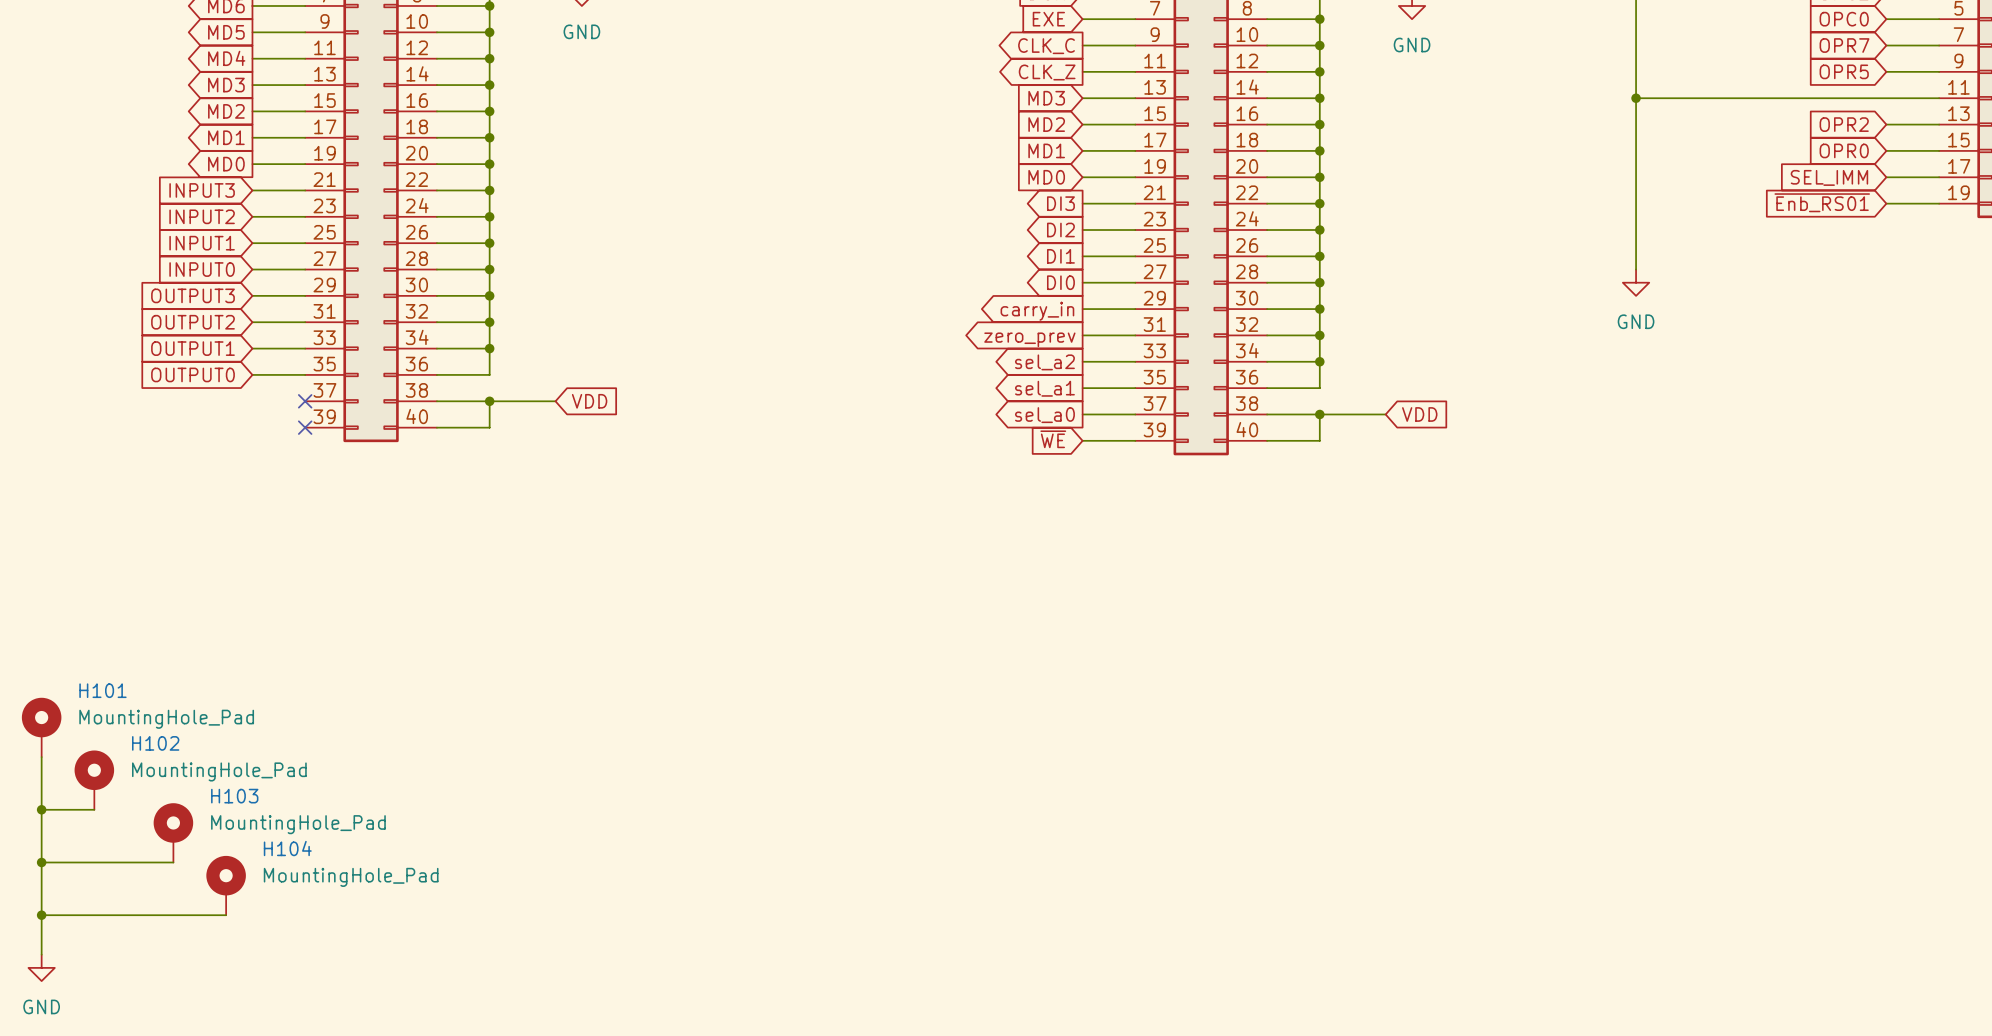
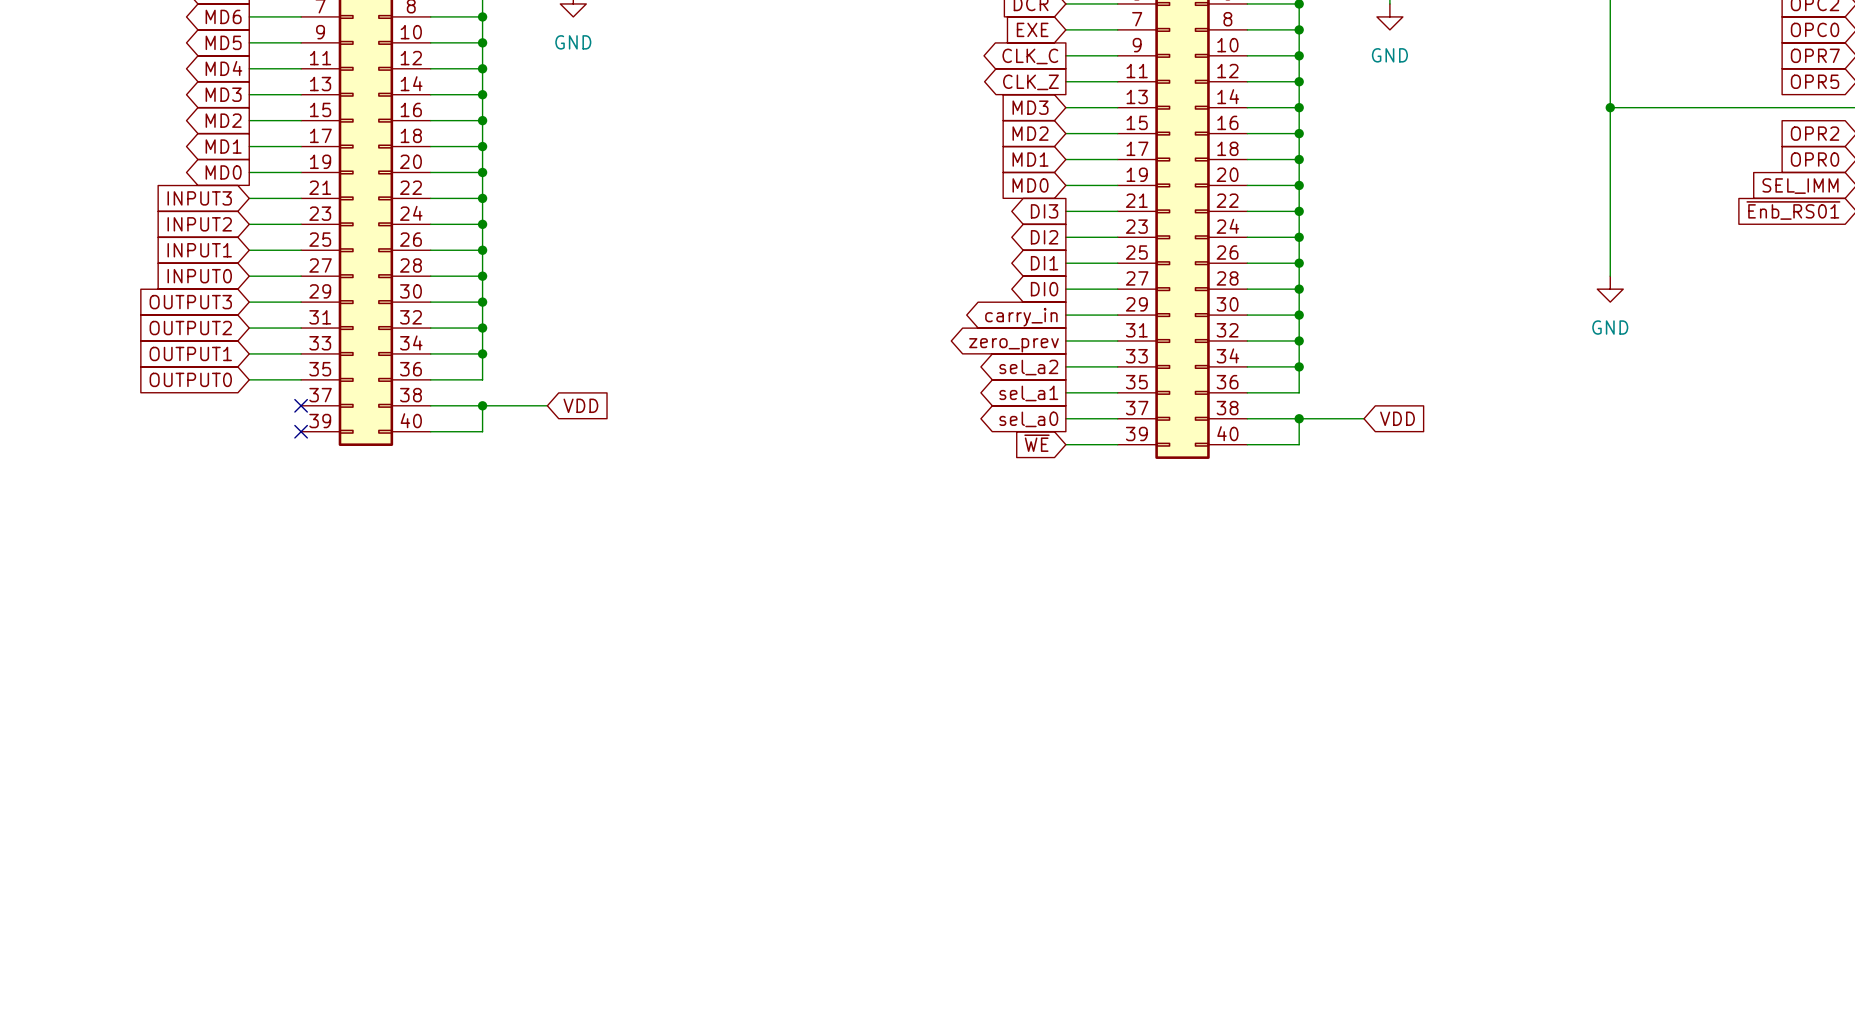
H101: MountingHole_Pad (41, 727) -> none
wire: (41, 757) (41, 954) -> none
H102: MountingHole_Pad (94, 780) -> none
wire: (41, 809) (94, 809) -> none
junction: (41, 809) -> none
H103: MountingHole_Pad (173, 832) -> none
wire: (41, 862) (173, 862) -> none
junction: (41, 862) -> none
H104: MountingHole_Pad (226, 885) -> none
wire: (41, 915) (226, 915) -> none
junction: (41, 915) -> none
power symbol: GND (41, 967) -> none

